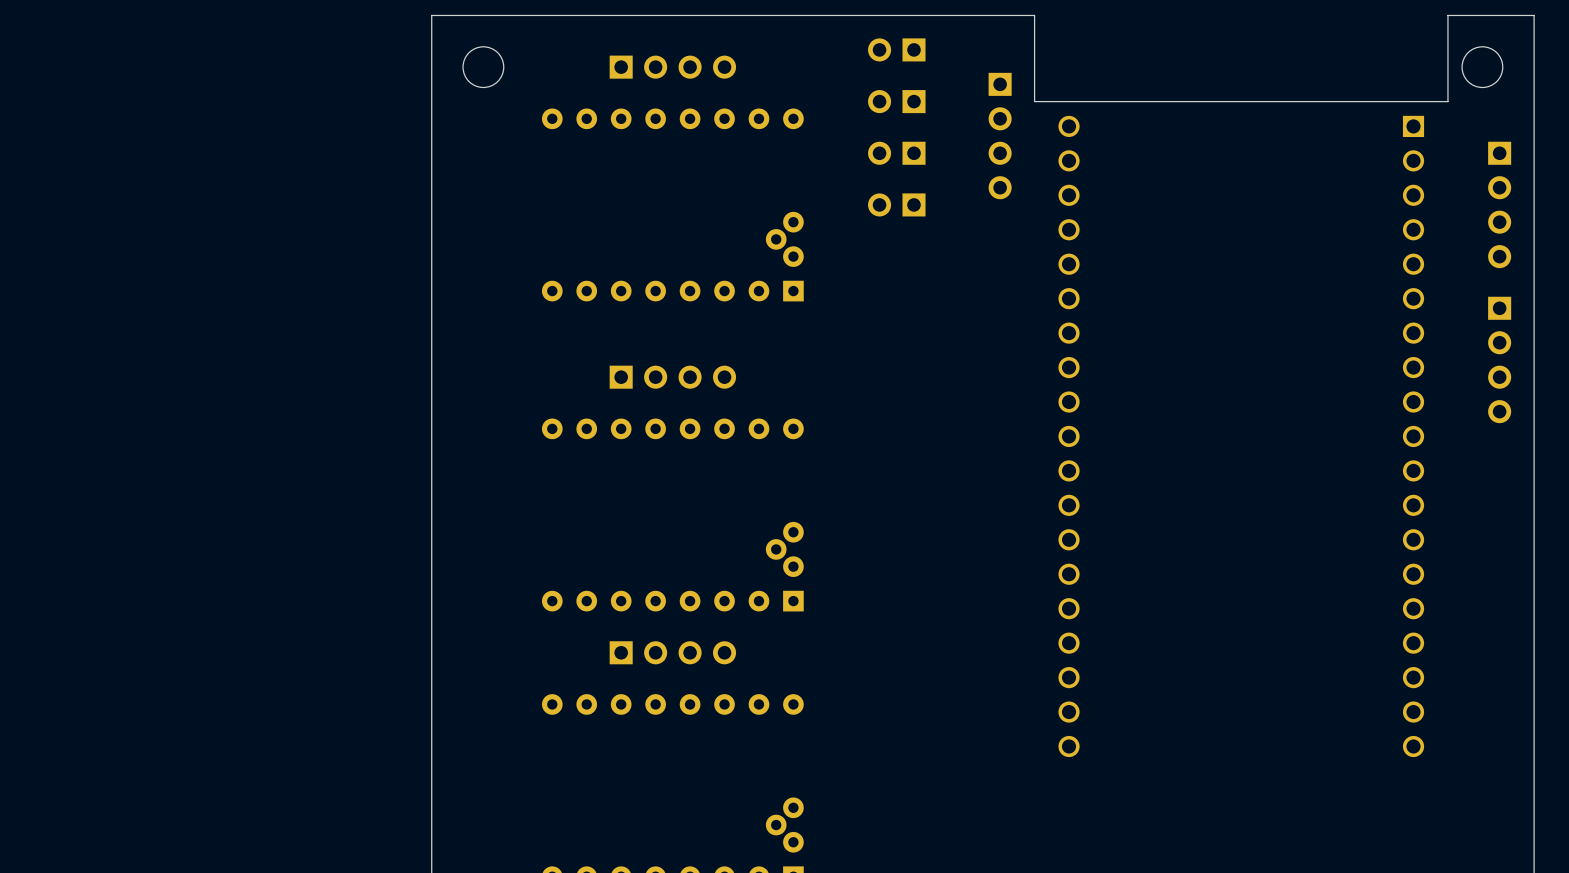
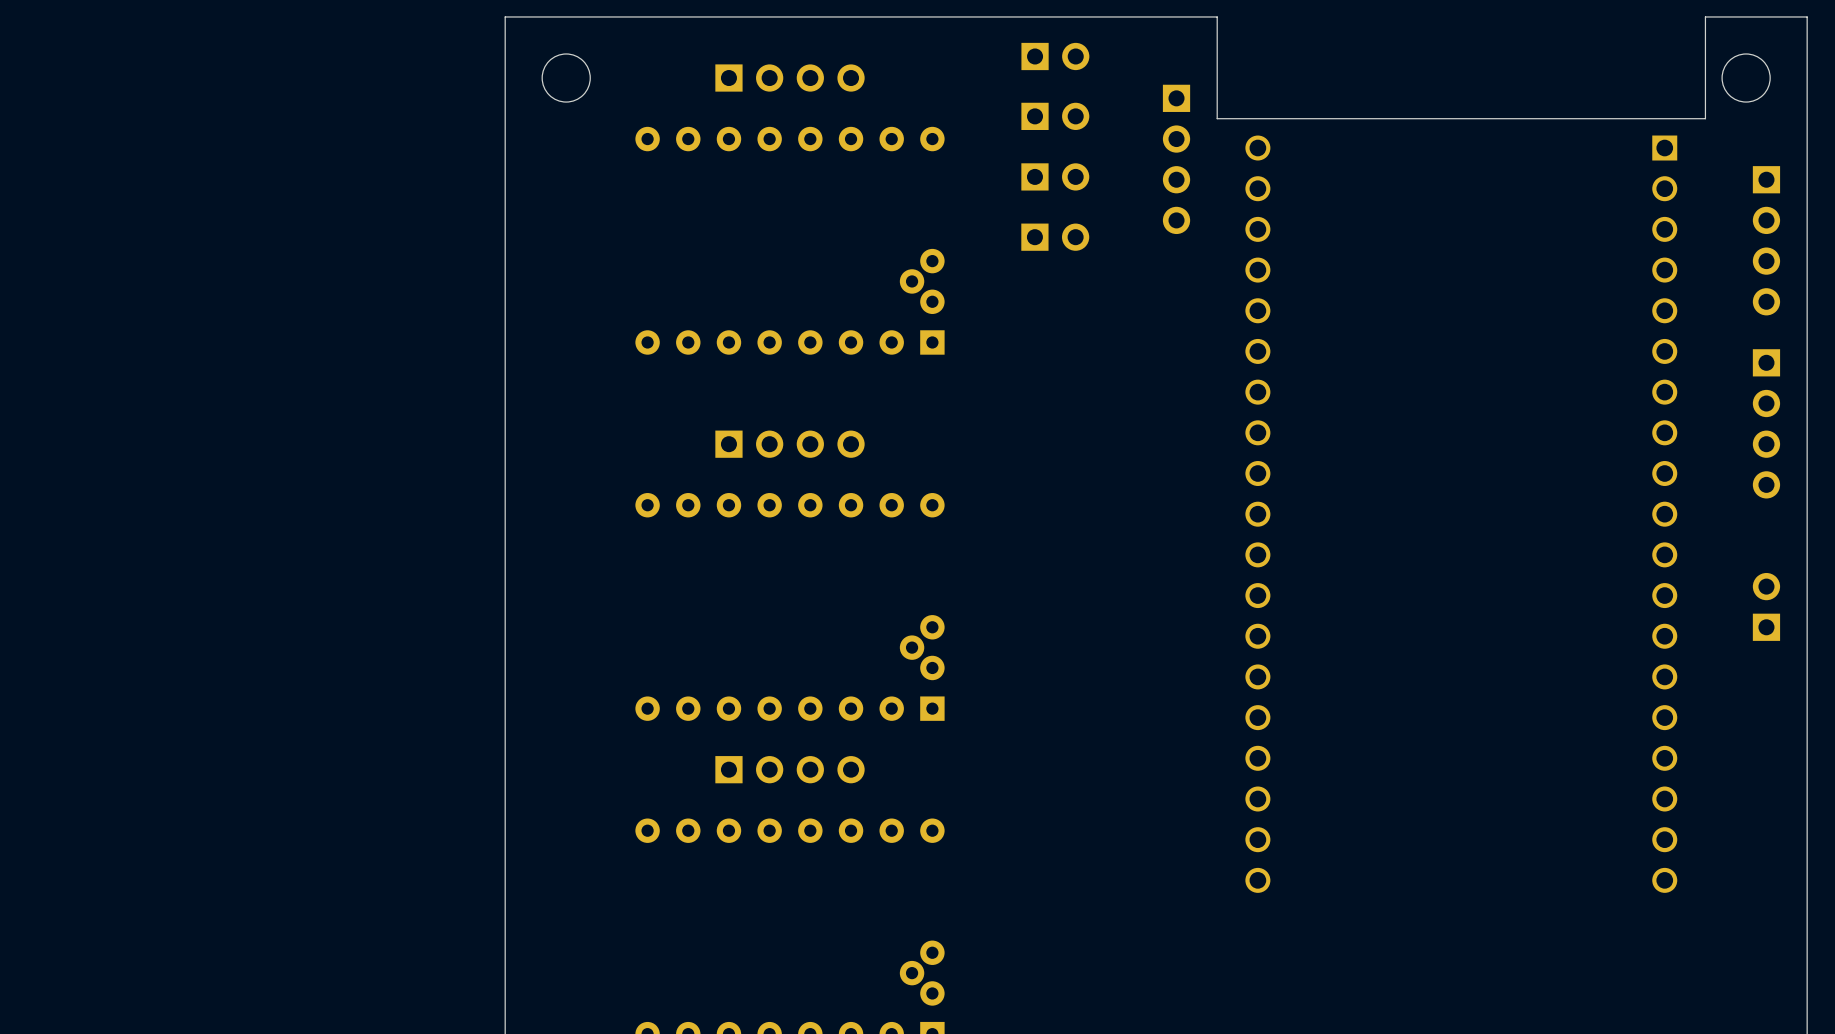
part rotation: 0° (896, 49) -> 180° (1055, 56)
part rotation: 0° (896, 101) -> 180° (1055, 116)
part rotation: 0° (896, 153) -> 180° (1055, 176)
part rotation: 0° (896, 204) -> 180° (1055, 237)
part: none -> (1766, 606)

